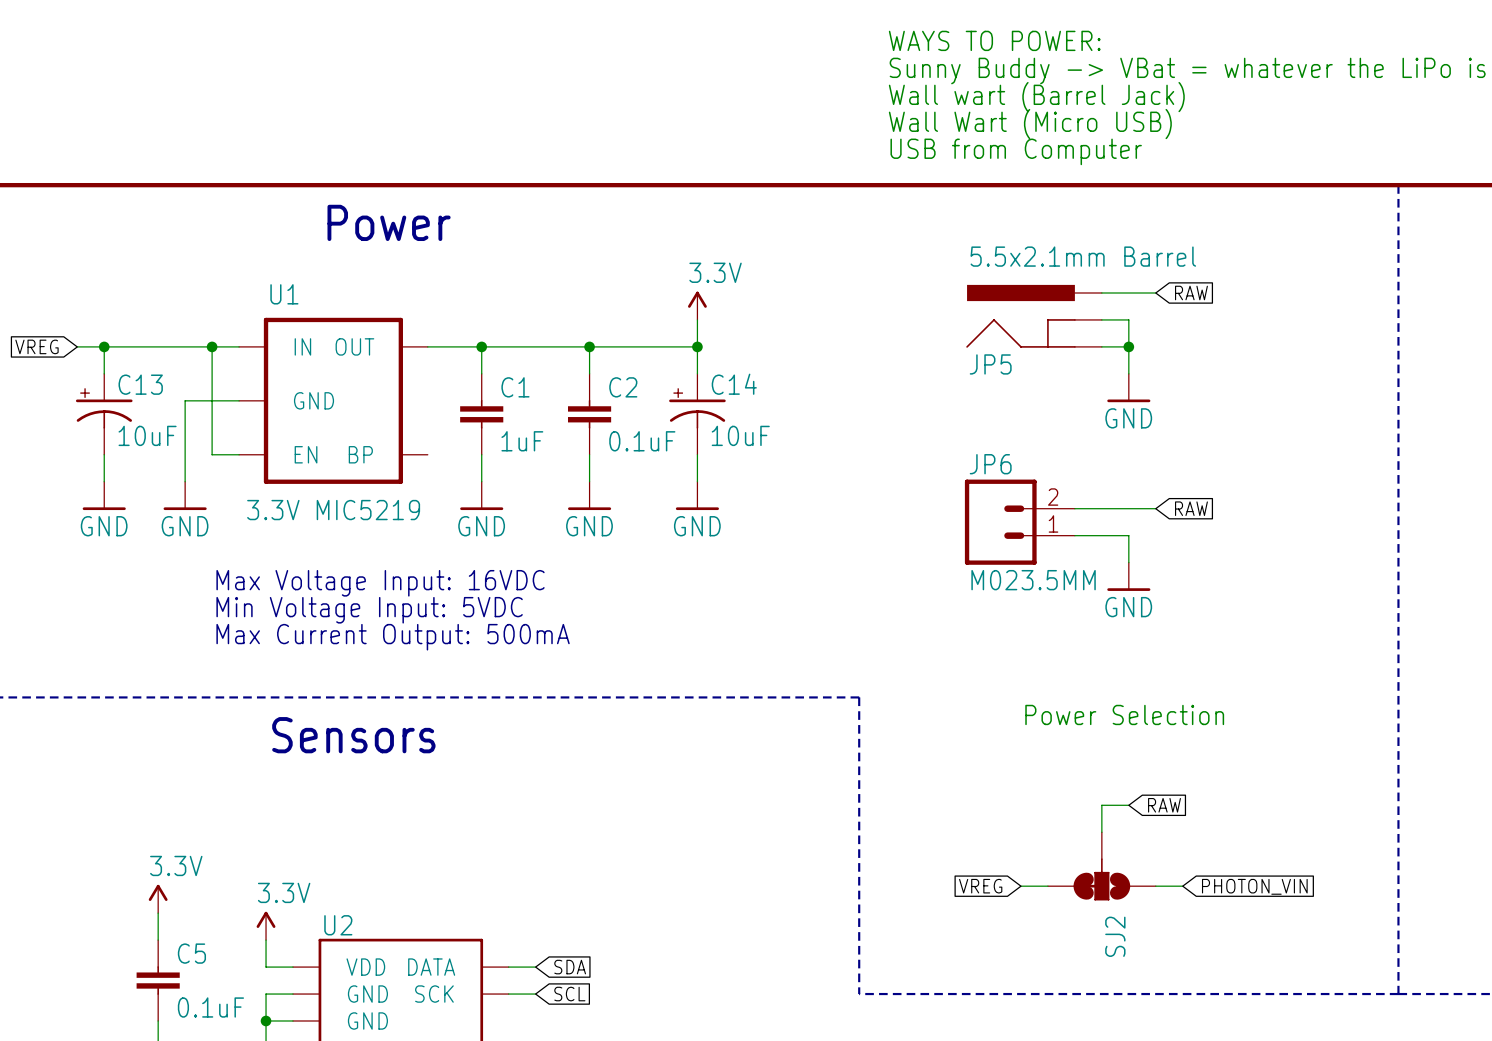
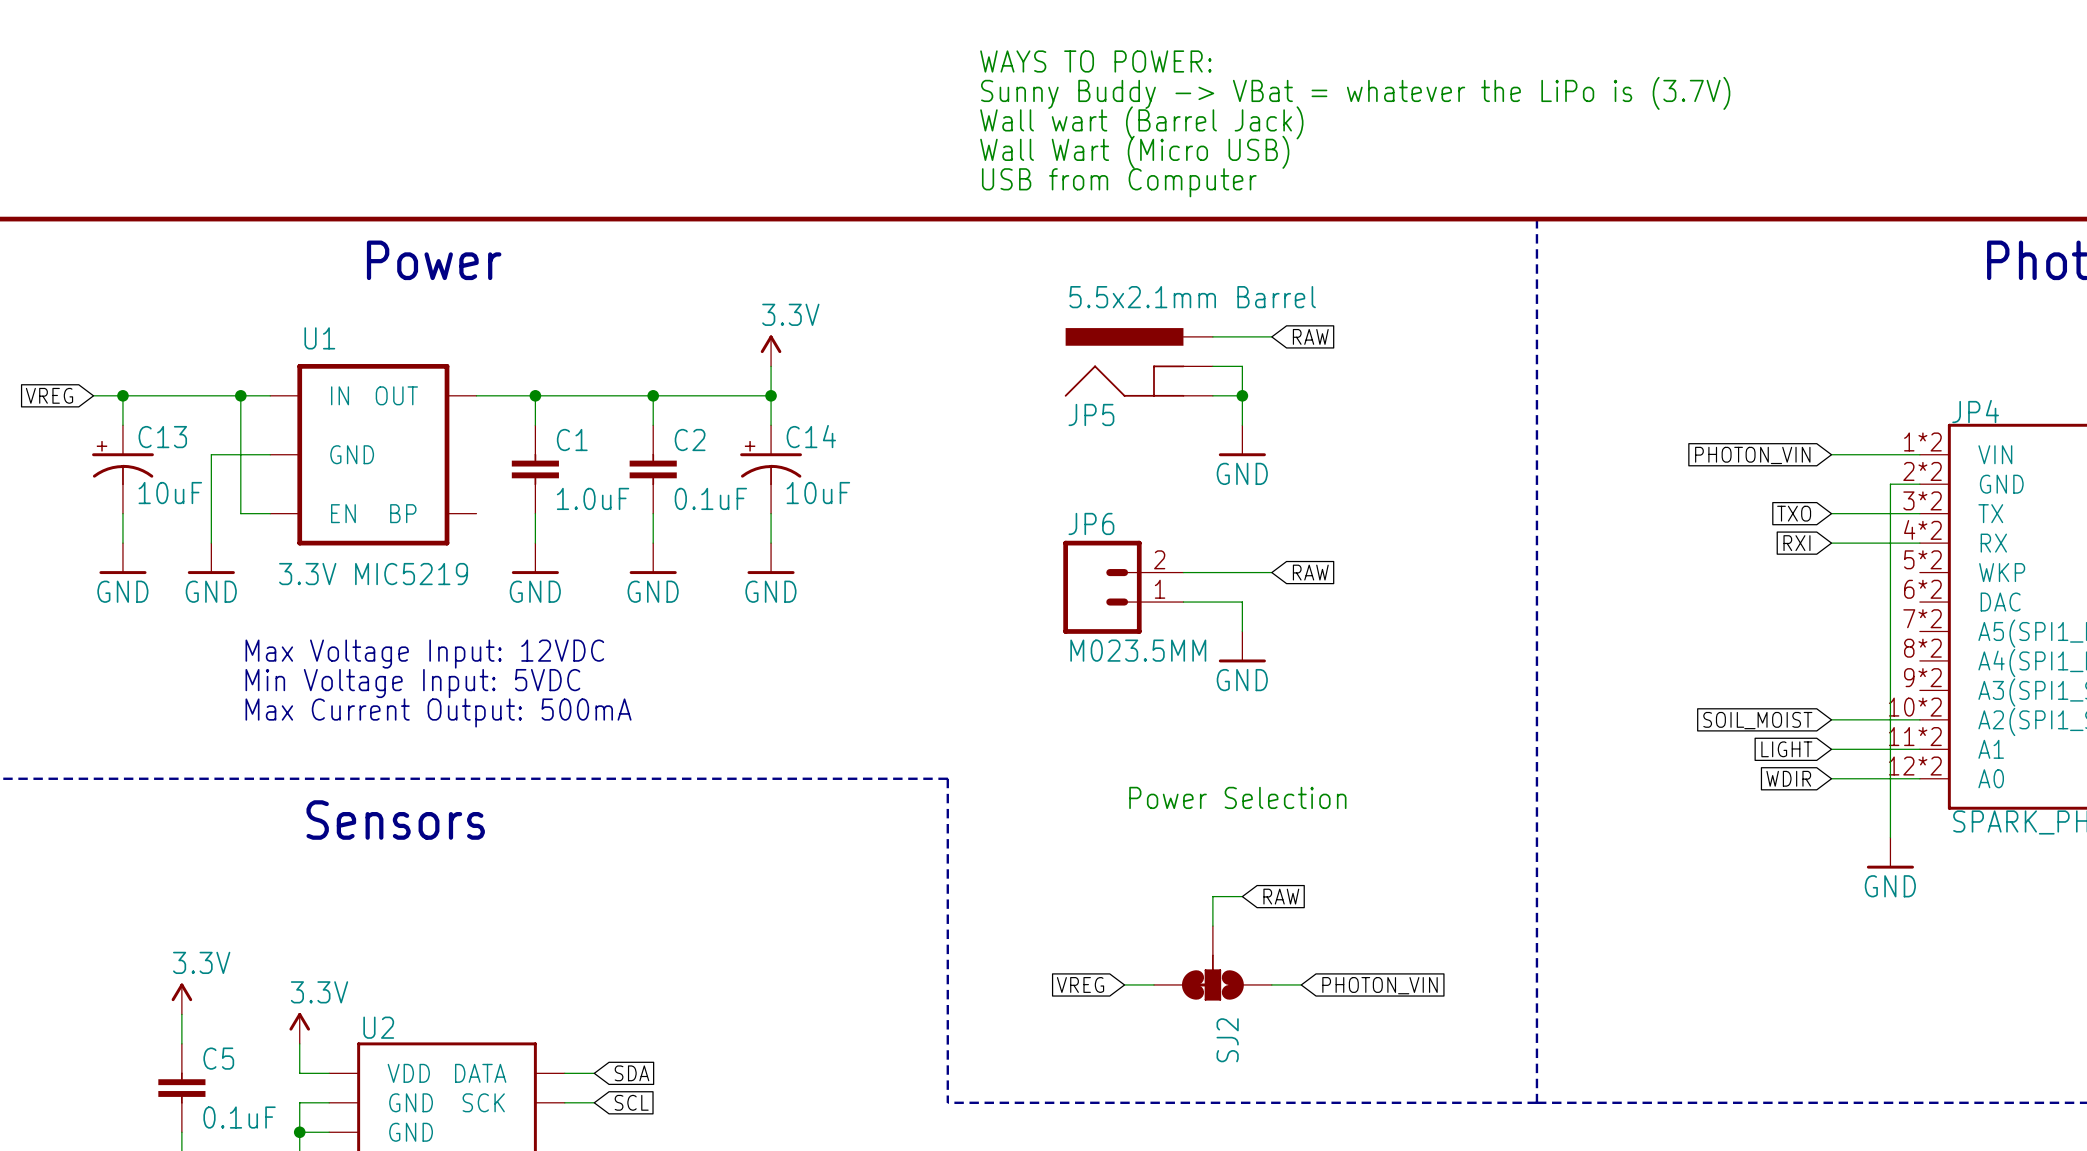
C1 value: 1uF (522, 441) -> 1.0uF (593, 498)
text: Max Voltage Input: 16VDC (380, 583) -> Max Voltage Input: 12VDC (424, 654)

